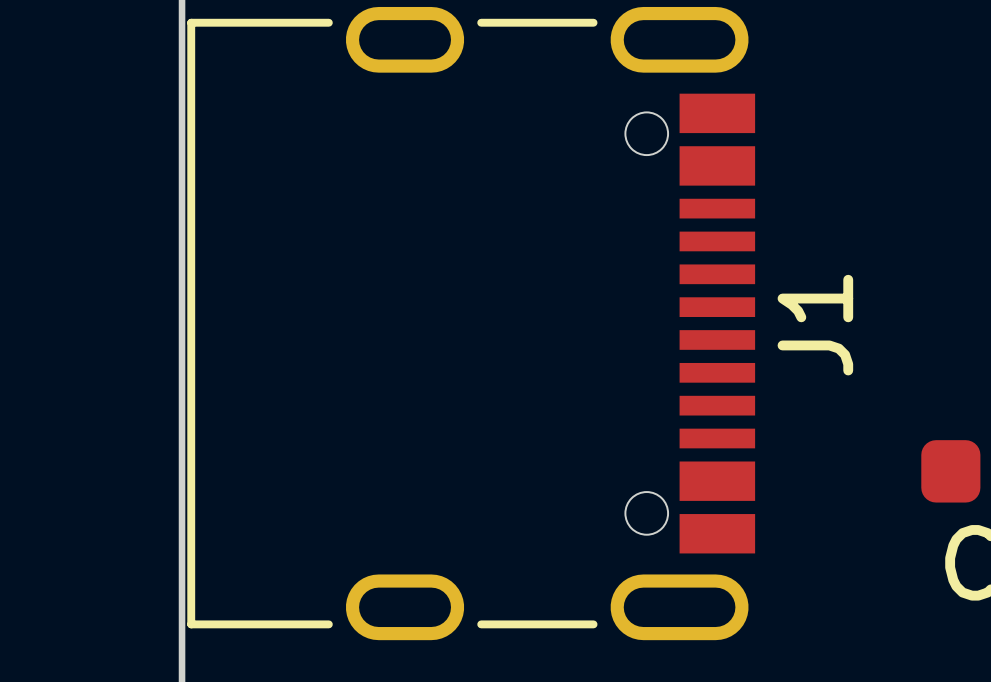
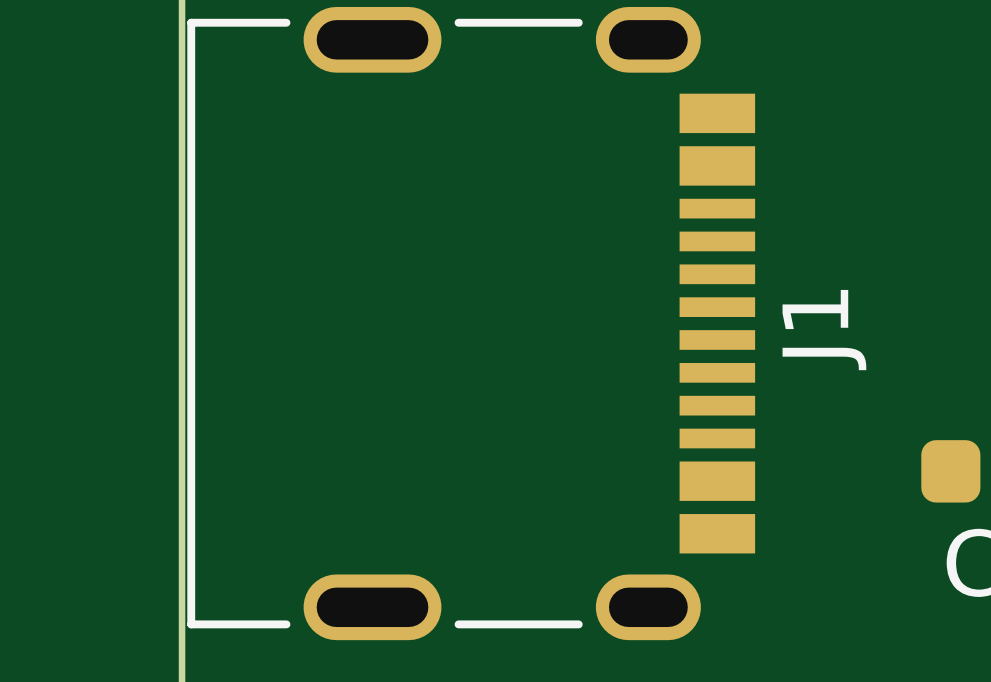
J1 footprint: [187, 6, 756, 641] -> [187, 6, 756, 641]

